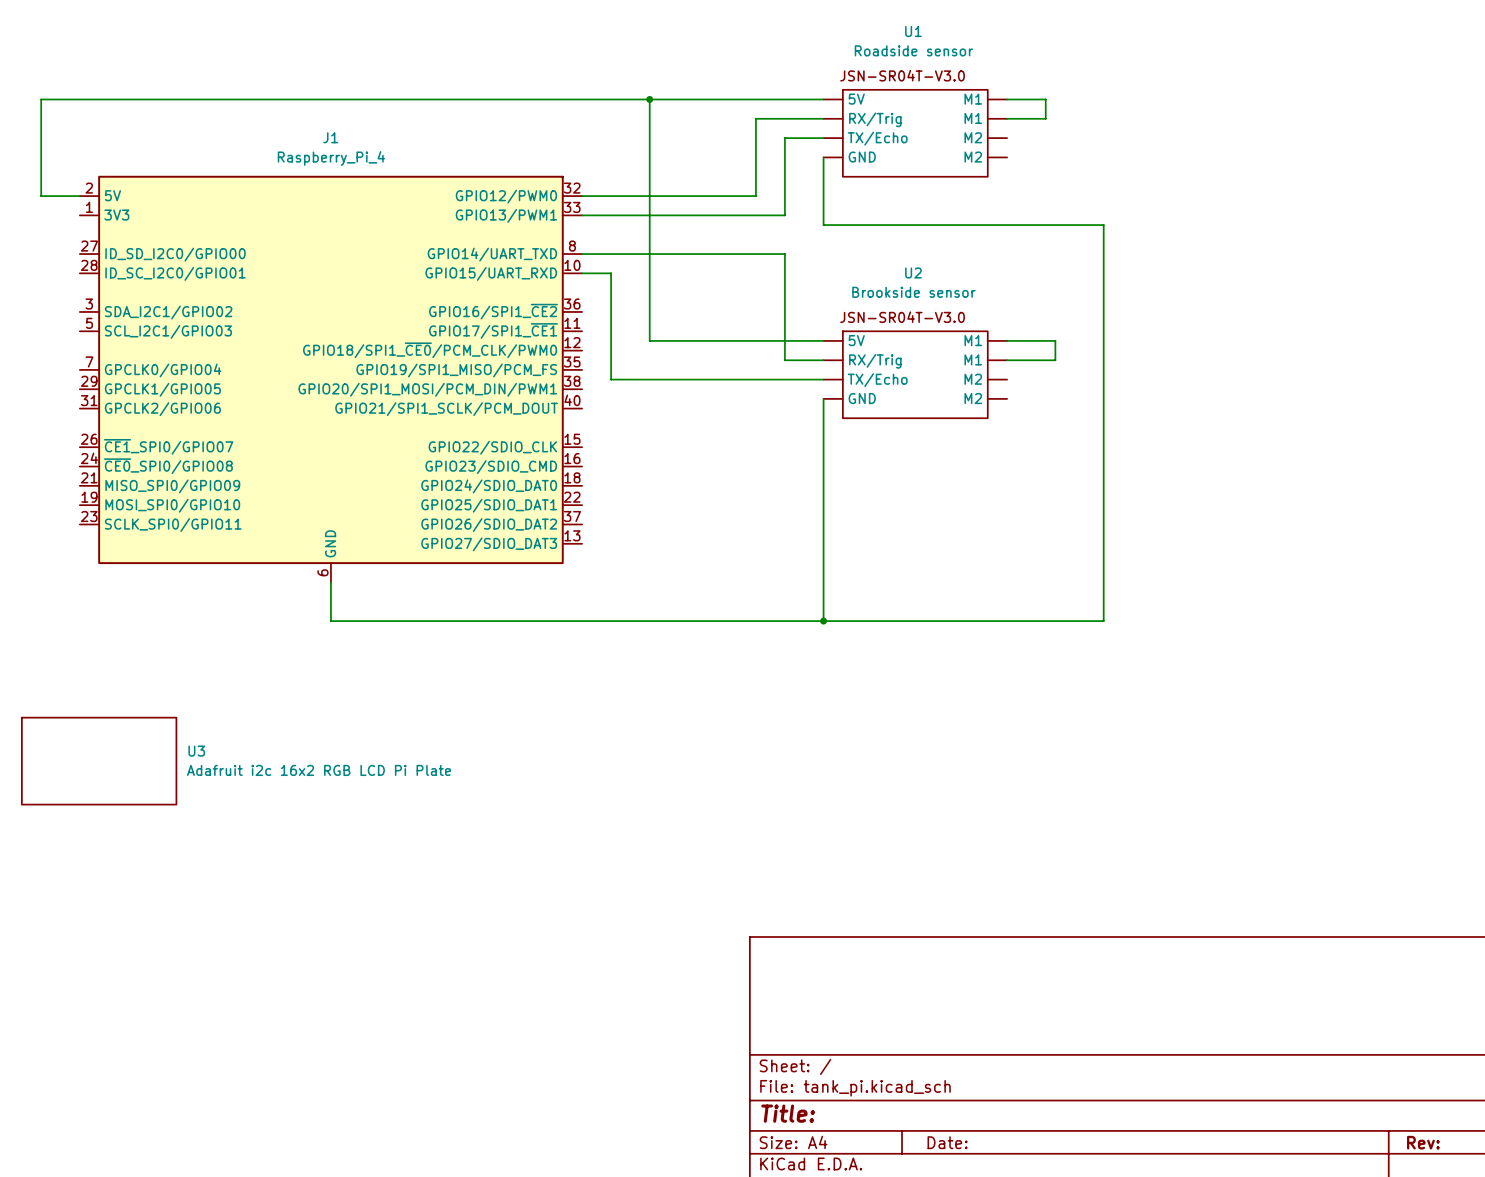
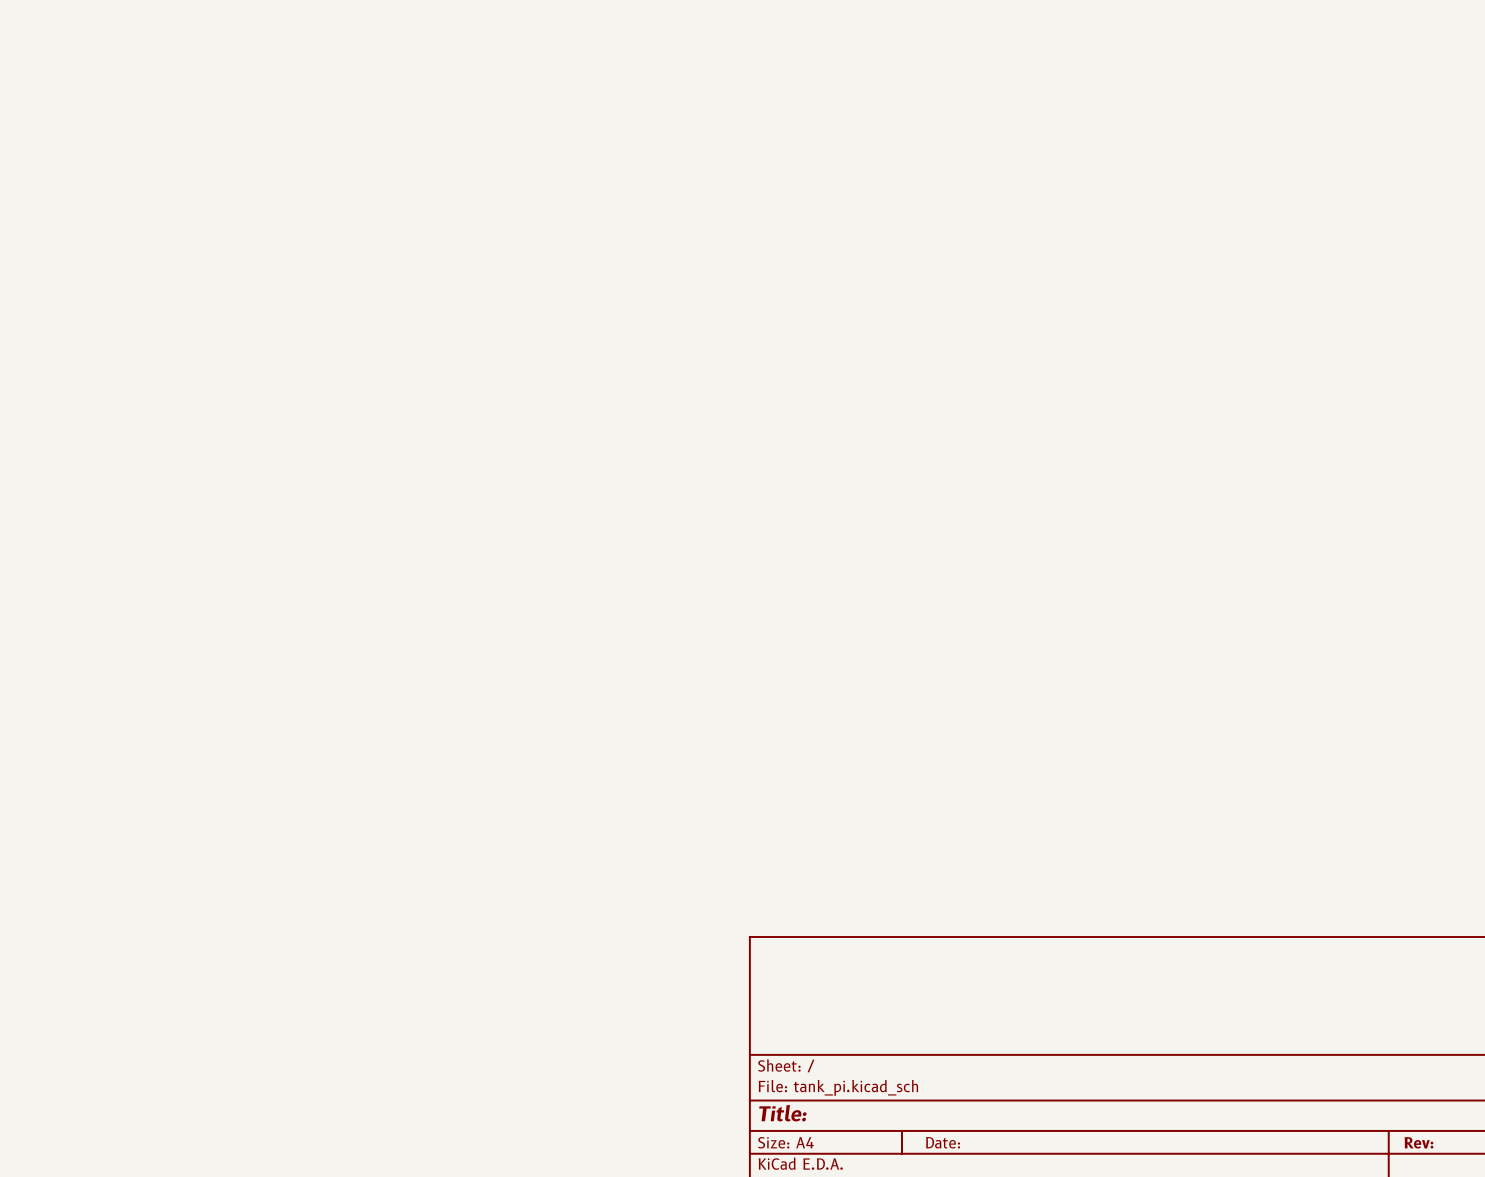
wire: (649, 99) (649, 340) (823, 340) -> none
junction: (649, 99) -> none
wire: (823, 99) (41, 99) (41, 196) (79, 196) -> none
wire: (1007, 99) (1045, 99) (1045, 118) (1007, 118) -> none
wire: (823, 118) (755, 118) (755, 196) (582, 196) -> none
U1: Roadside sensor (915, 133) -> none
wire: (823, 138) (784, 138) (784, 215) (582, 215) -> none
wire: (823, 157) (823, 225) (1103, 225) (1103, 621) (330, 621) (330, 582) -> none
wire: (582, 254) (784, 254) (784, 360) (823, 360) -> none
wire: (582, 273) (611, 273) (611, 379) (823, 379) -> none
wire: (1007, 340) (1055, 340) (1055, 360) (1007, 360) -> none
U2: Brookside sensor (915, 374) -> none
J1: Raspberry_Pi_4 (330, 379) -> none
wire: (823, 398) (823, 621) -> none
junction: (823, 621) -> none
U3: Adafruit i2c 16x2 RGB LCD Pi Plate (99, 761) -> none

